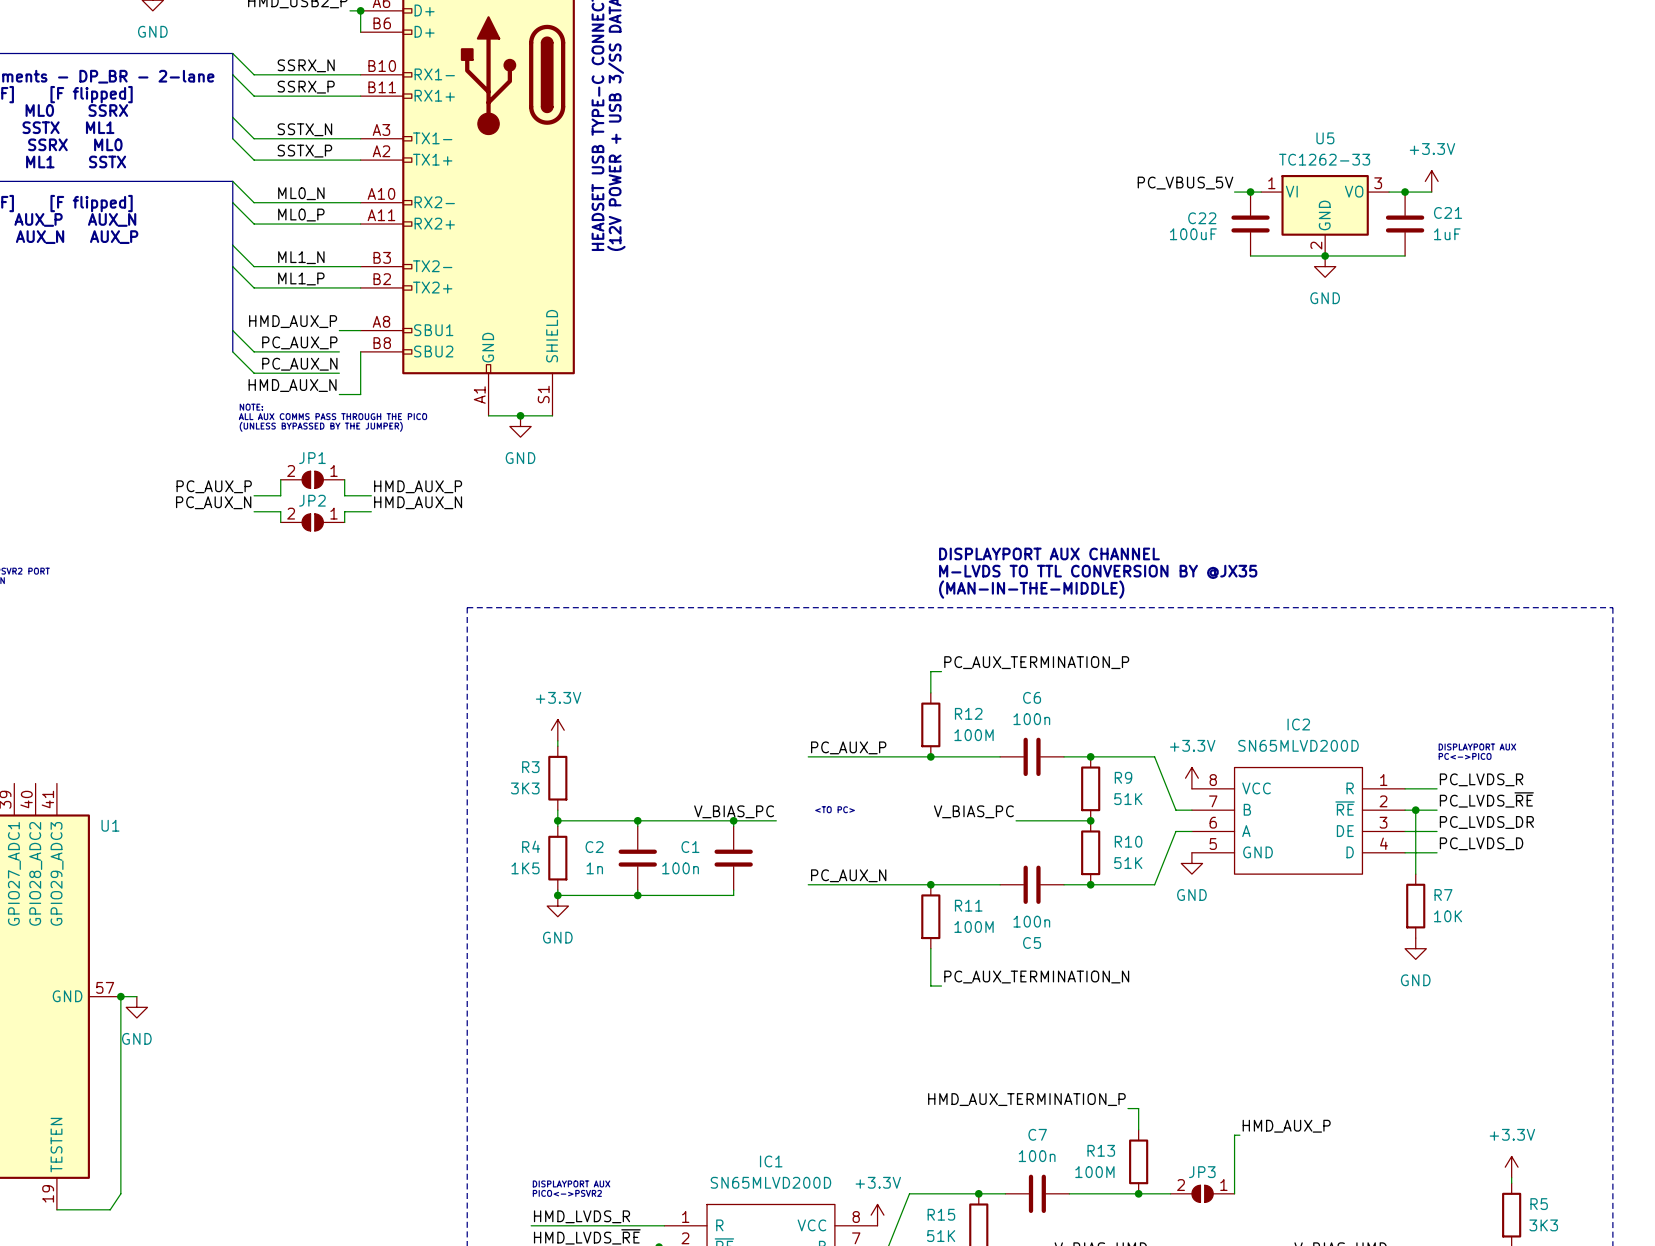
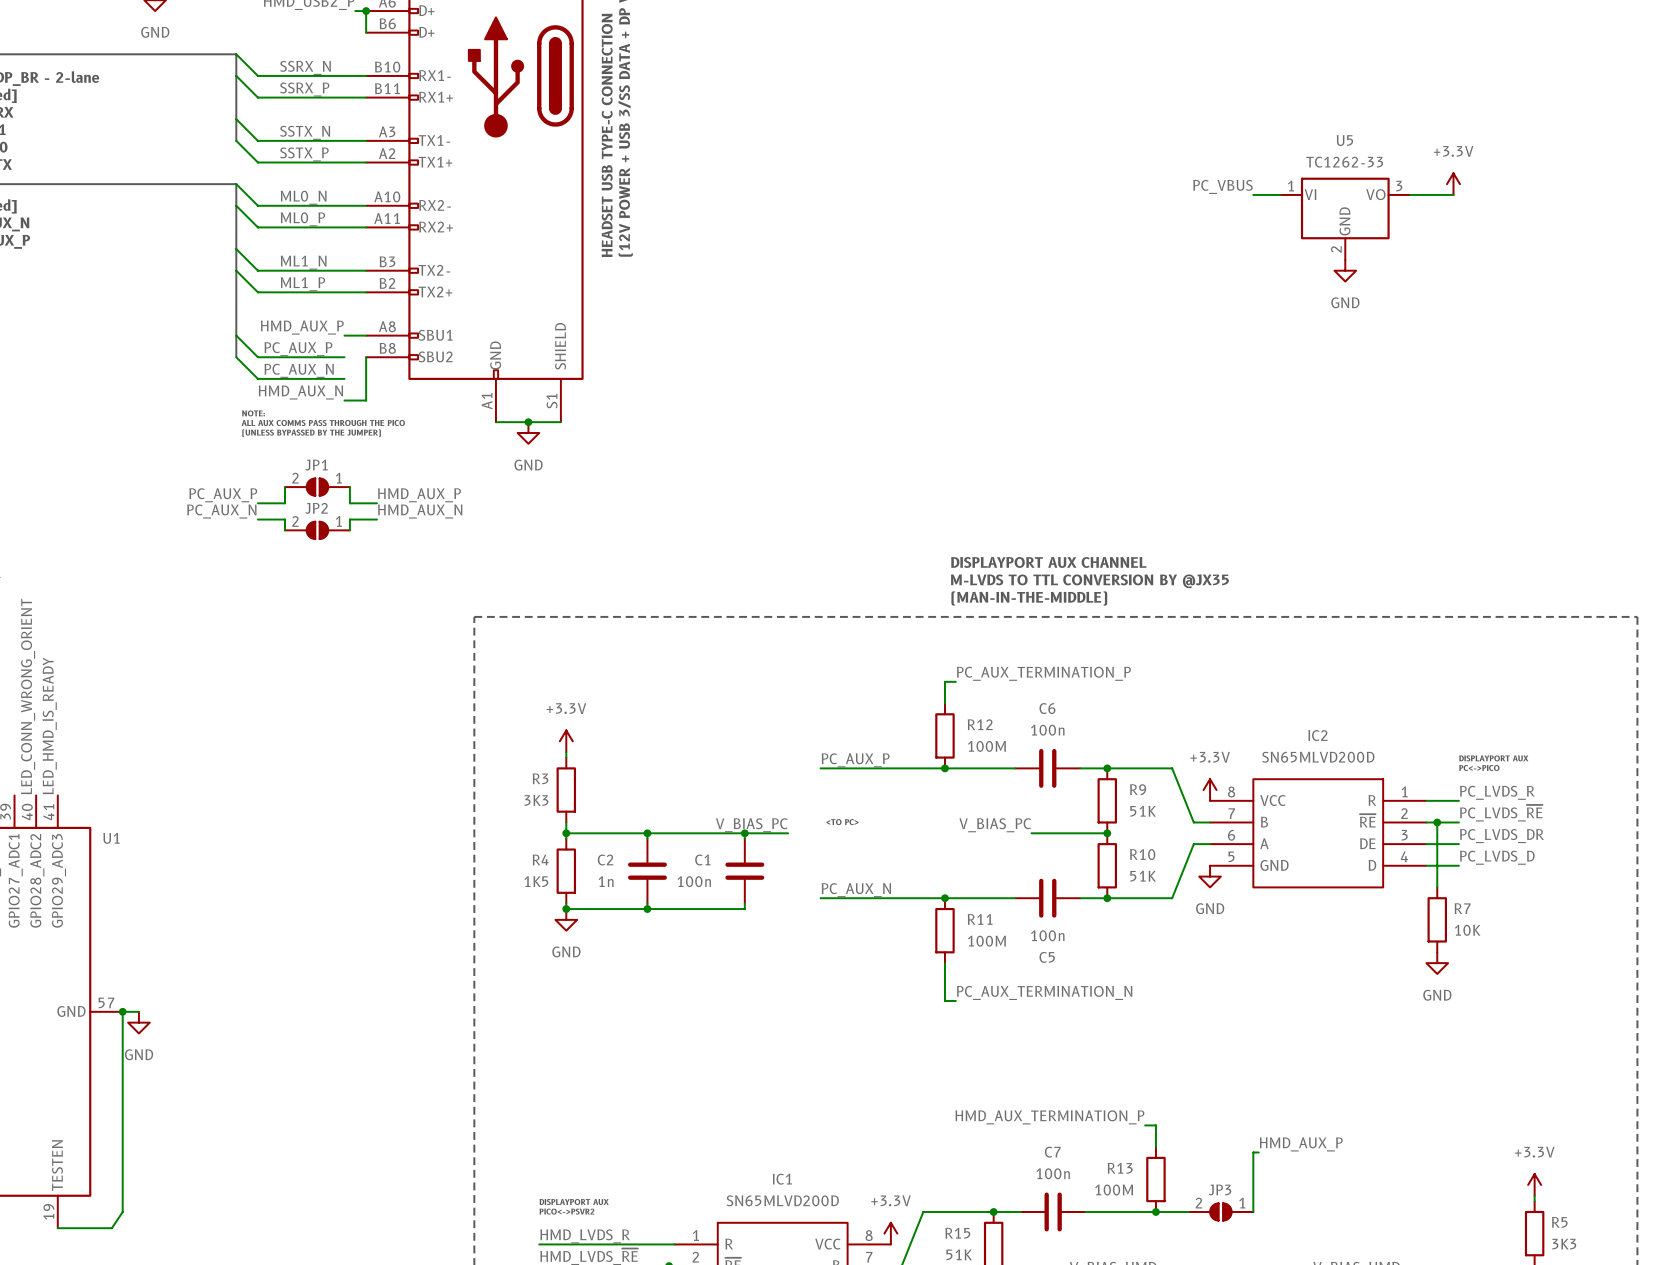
label: PC_VBUS_5V (1185, 183) -> PC_VBUS (1222, 186)
junction: (1250, 192) -> none
junction: (1405, 192) -> none
C22: 100uF (1250, 224) -> none
C21: 1uF (1405, 224) -> none
wire: (1250, 255) (1405, 255) -> none
junction: (1325, 255) -> none
label: none -> LED_CONN_WRONG_ORIENT (28, 696)
label: none -> LED_HMD_IS_READY (49, 726)

